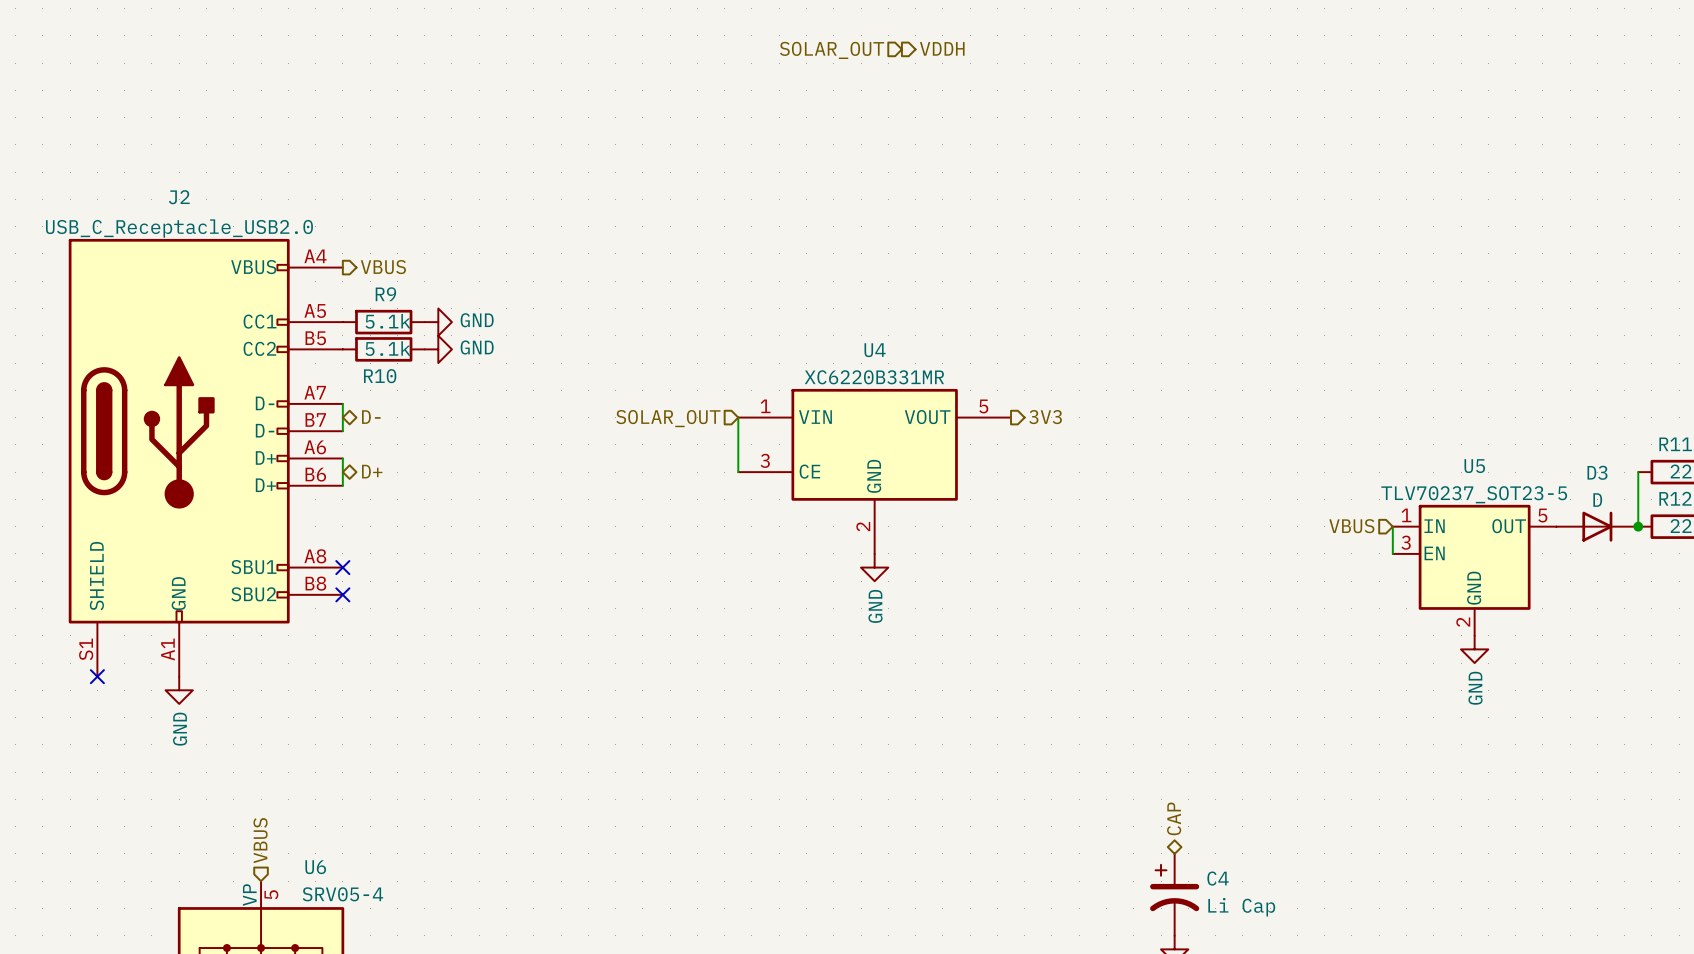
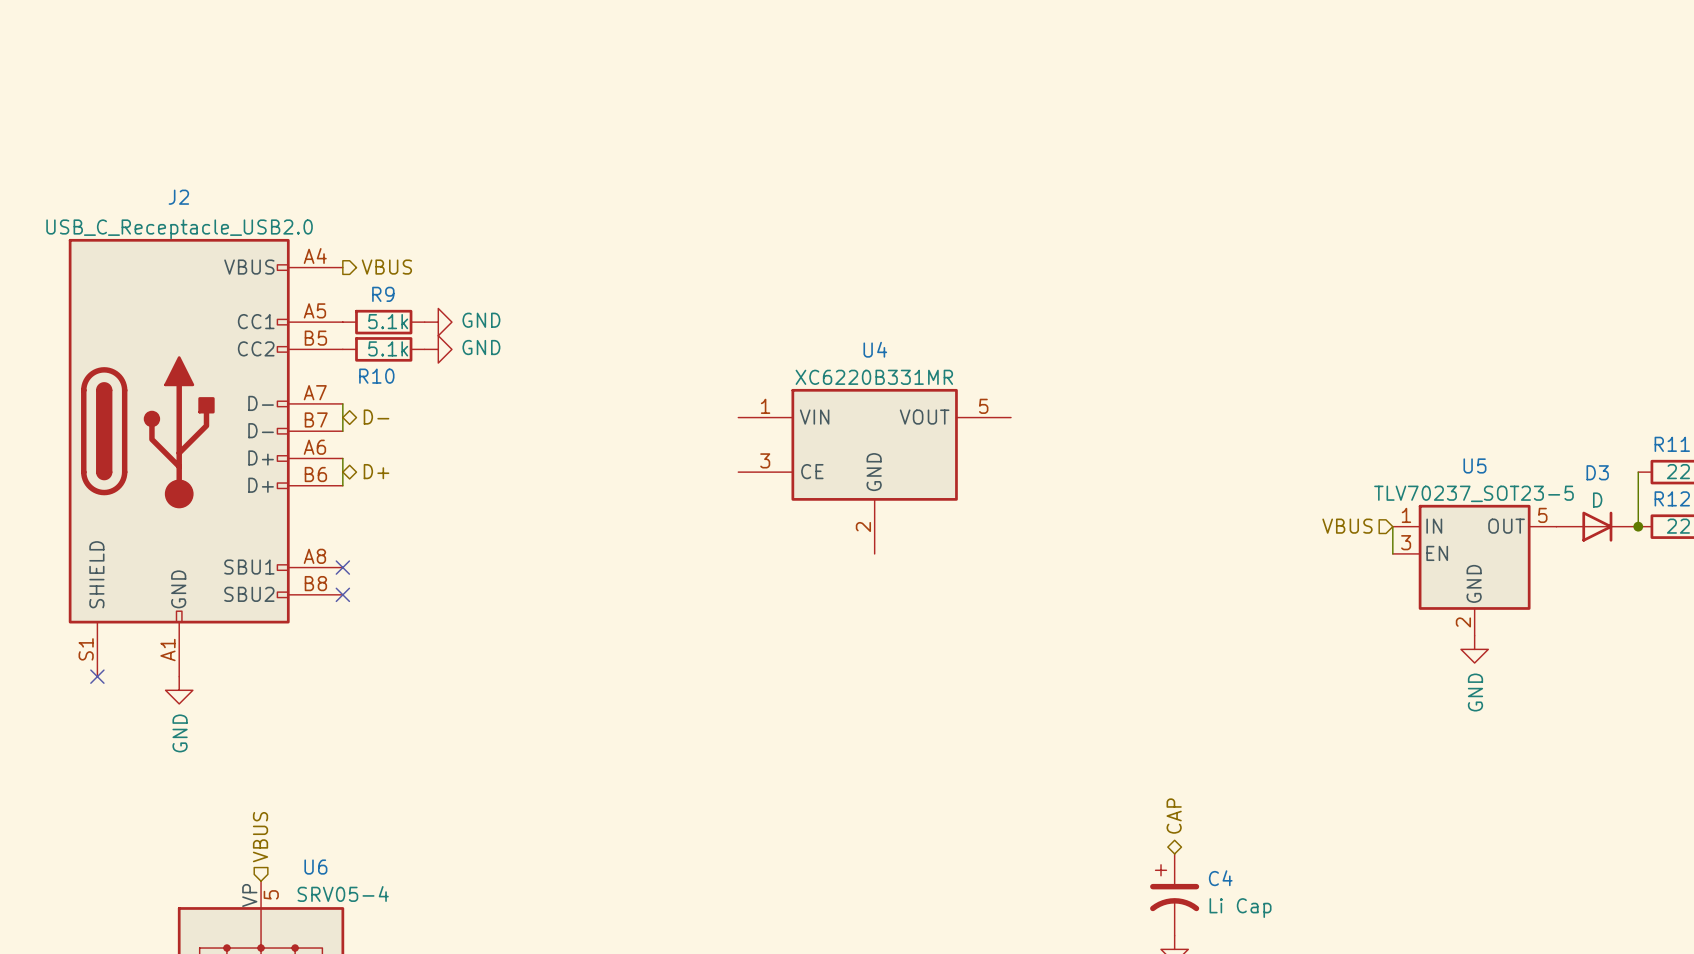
hierarchical label: VDDH (942, 48) -> none
hierarchical label: SOLAR_OUT (832, 50) -> none
wire: (738, 417) (738, 472) -> none
hierarchical label: 3V3 (1045, 417) -> none
hierarchical label: SOLAR_OUT (668, 418) -> none
power symbol: GND (874, 567) -> none

